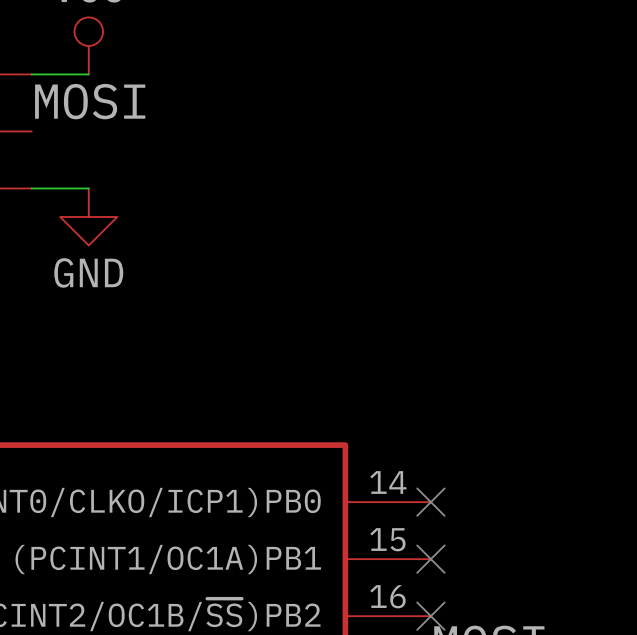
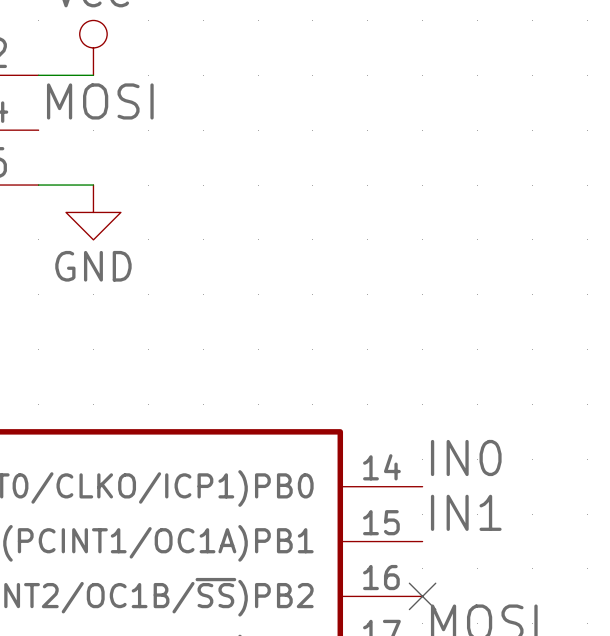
label: none -> IN0 (466, 457)
no-connect mark: (430, 502) -> none
label: none -> IN1 (466, 512)
no-connect mark: (430, 559) -> none

